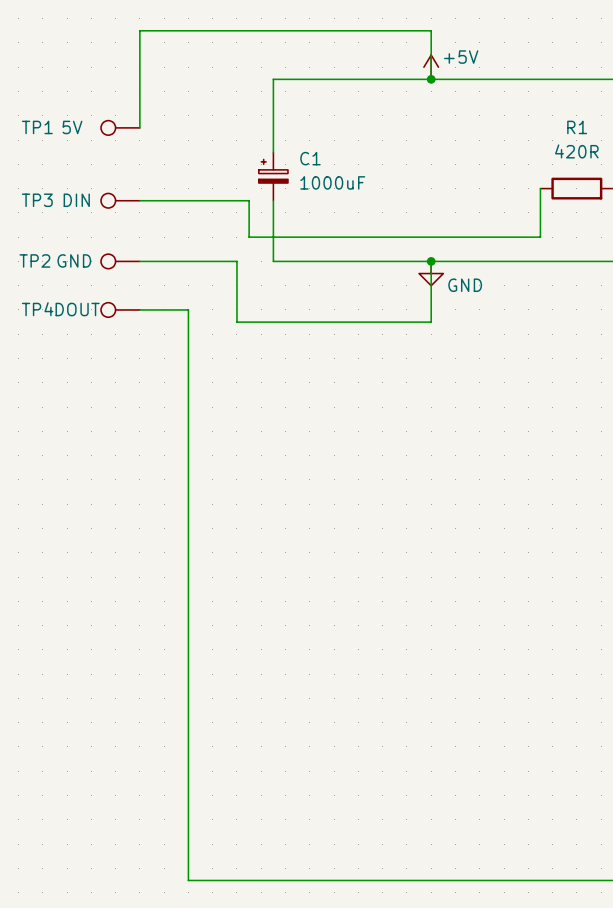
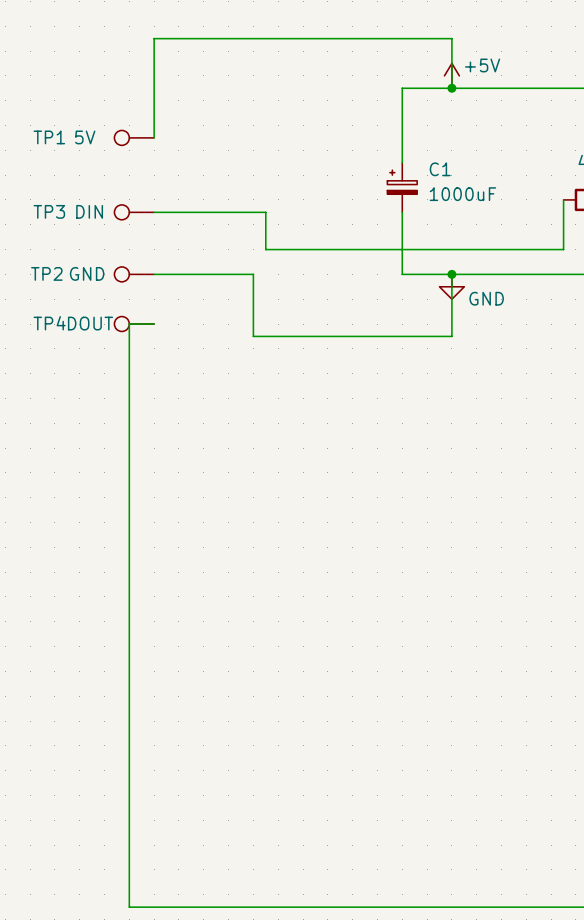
wire: (382, 79) (273, 79) (273, 152) -> (402, 88) (402, 162)
C1 position: (273, 176) -> (402, 187)
wire: (273, 200) (273, 261) (382, 261) -> (402, 212) (402, 274)
wire: (139, 309) (188, 309) (188, 880) -> (154, 324) (129, 324) (129, 907) (203, 907)

